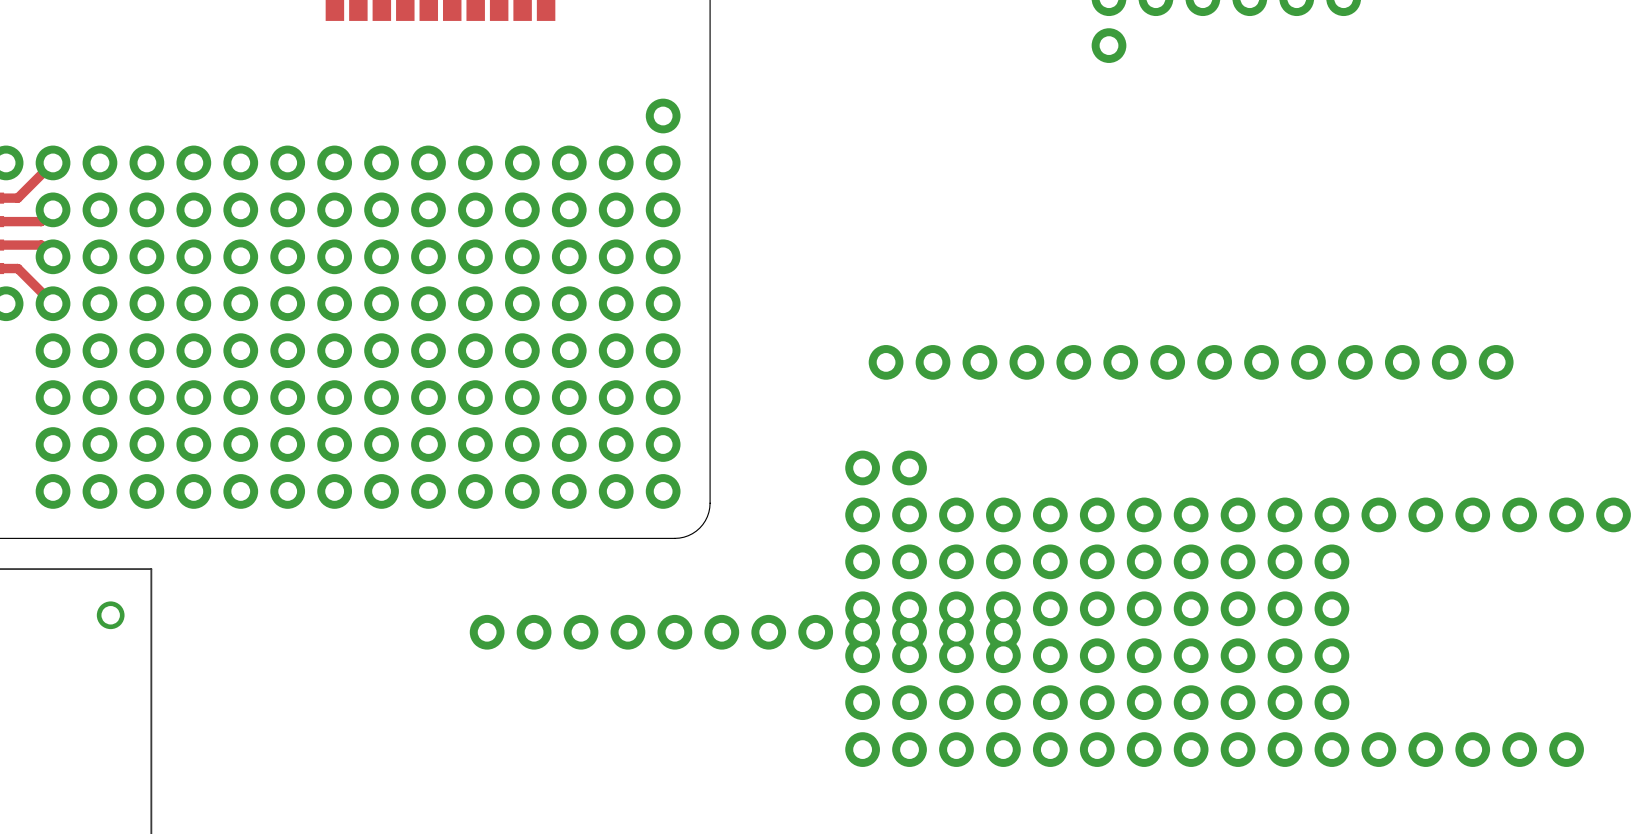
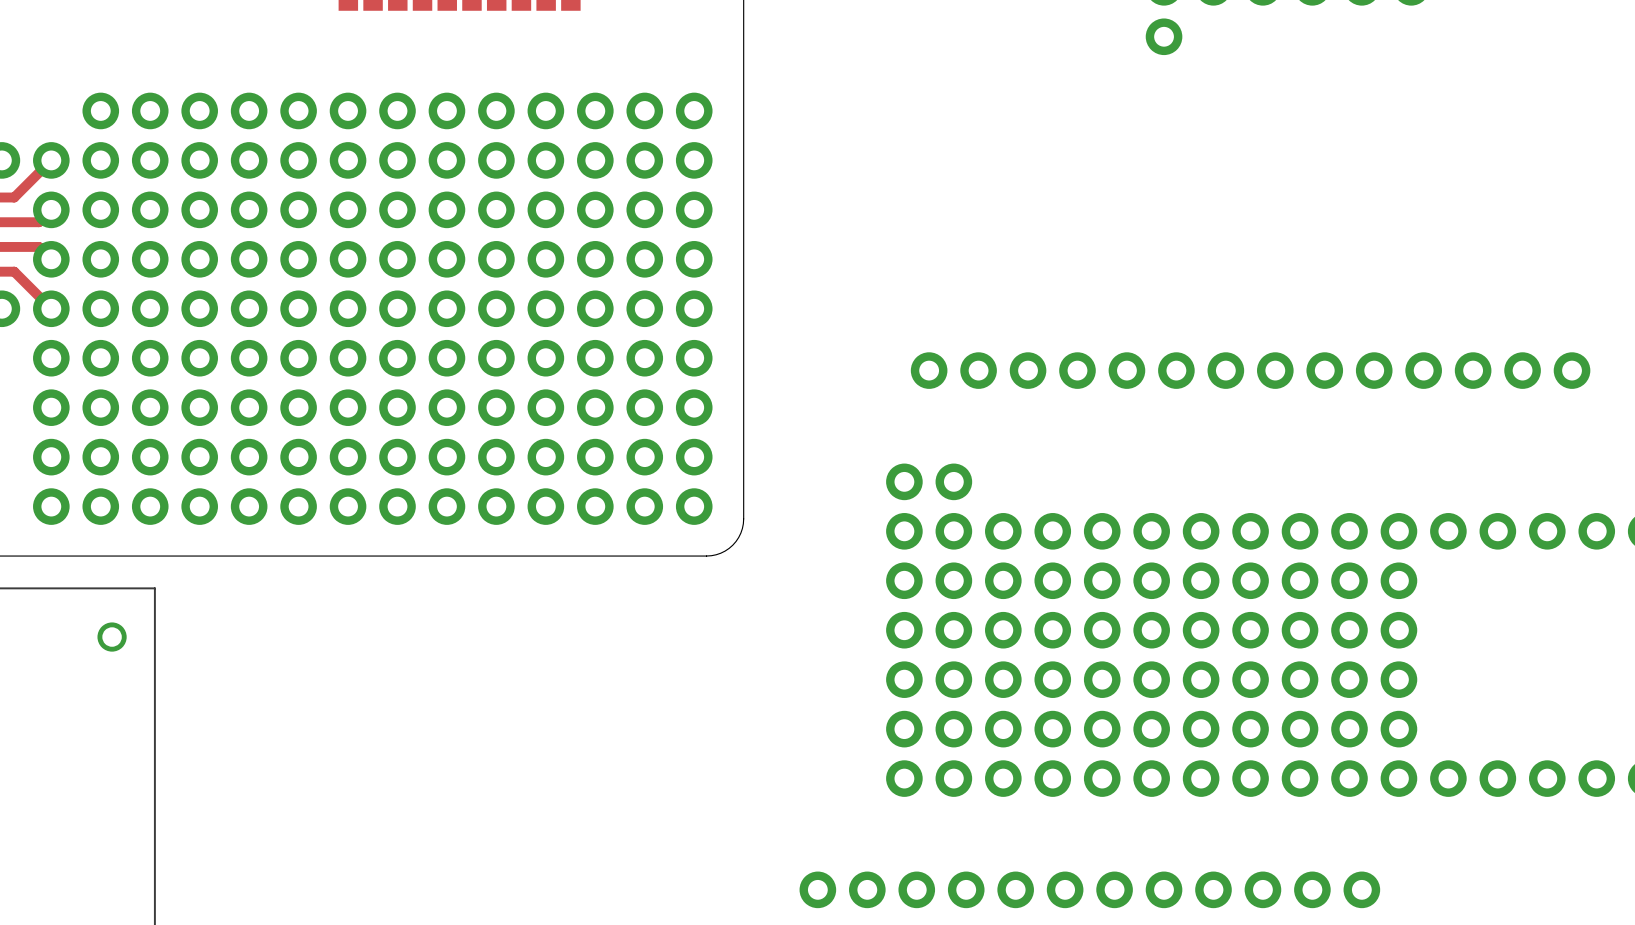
part: none -> (372, 110)
part: (745, 632) -> none

